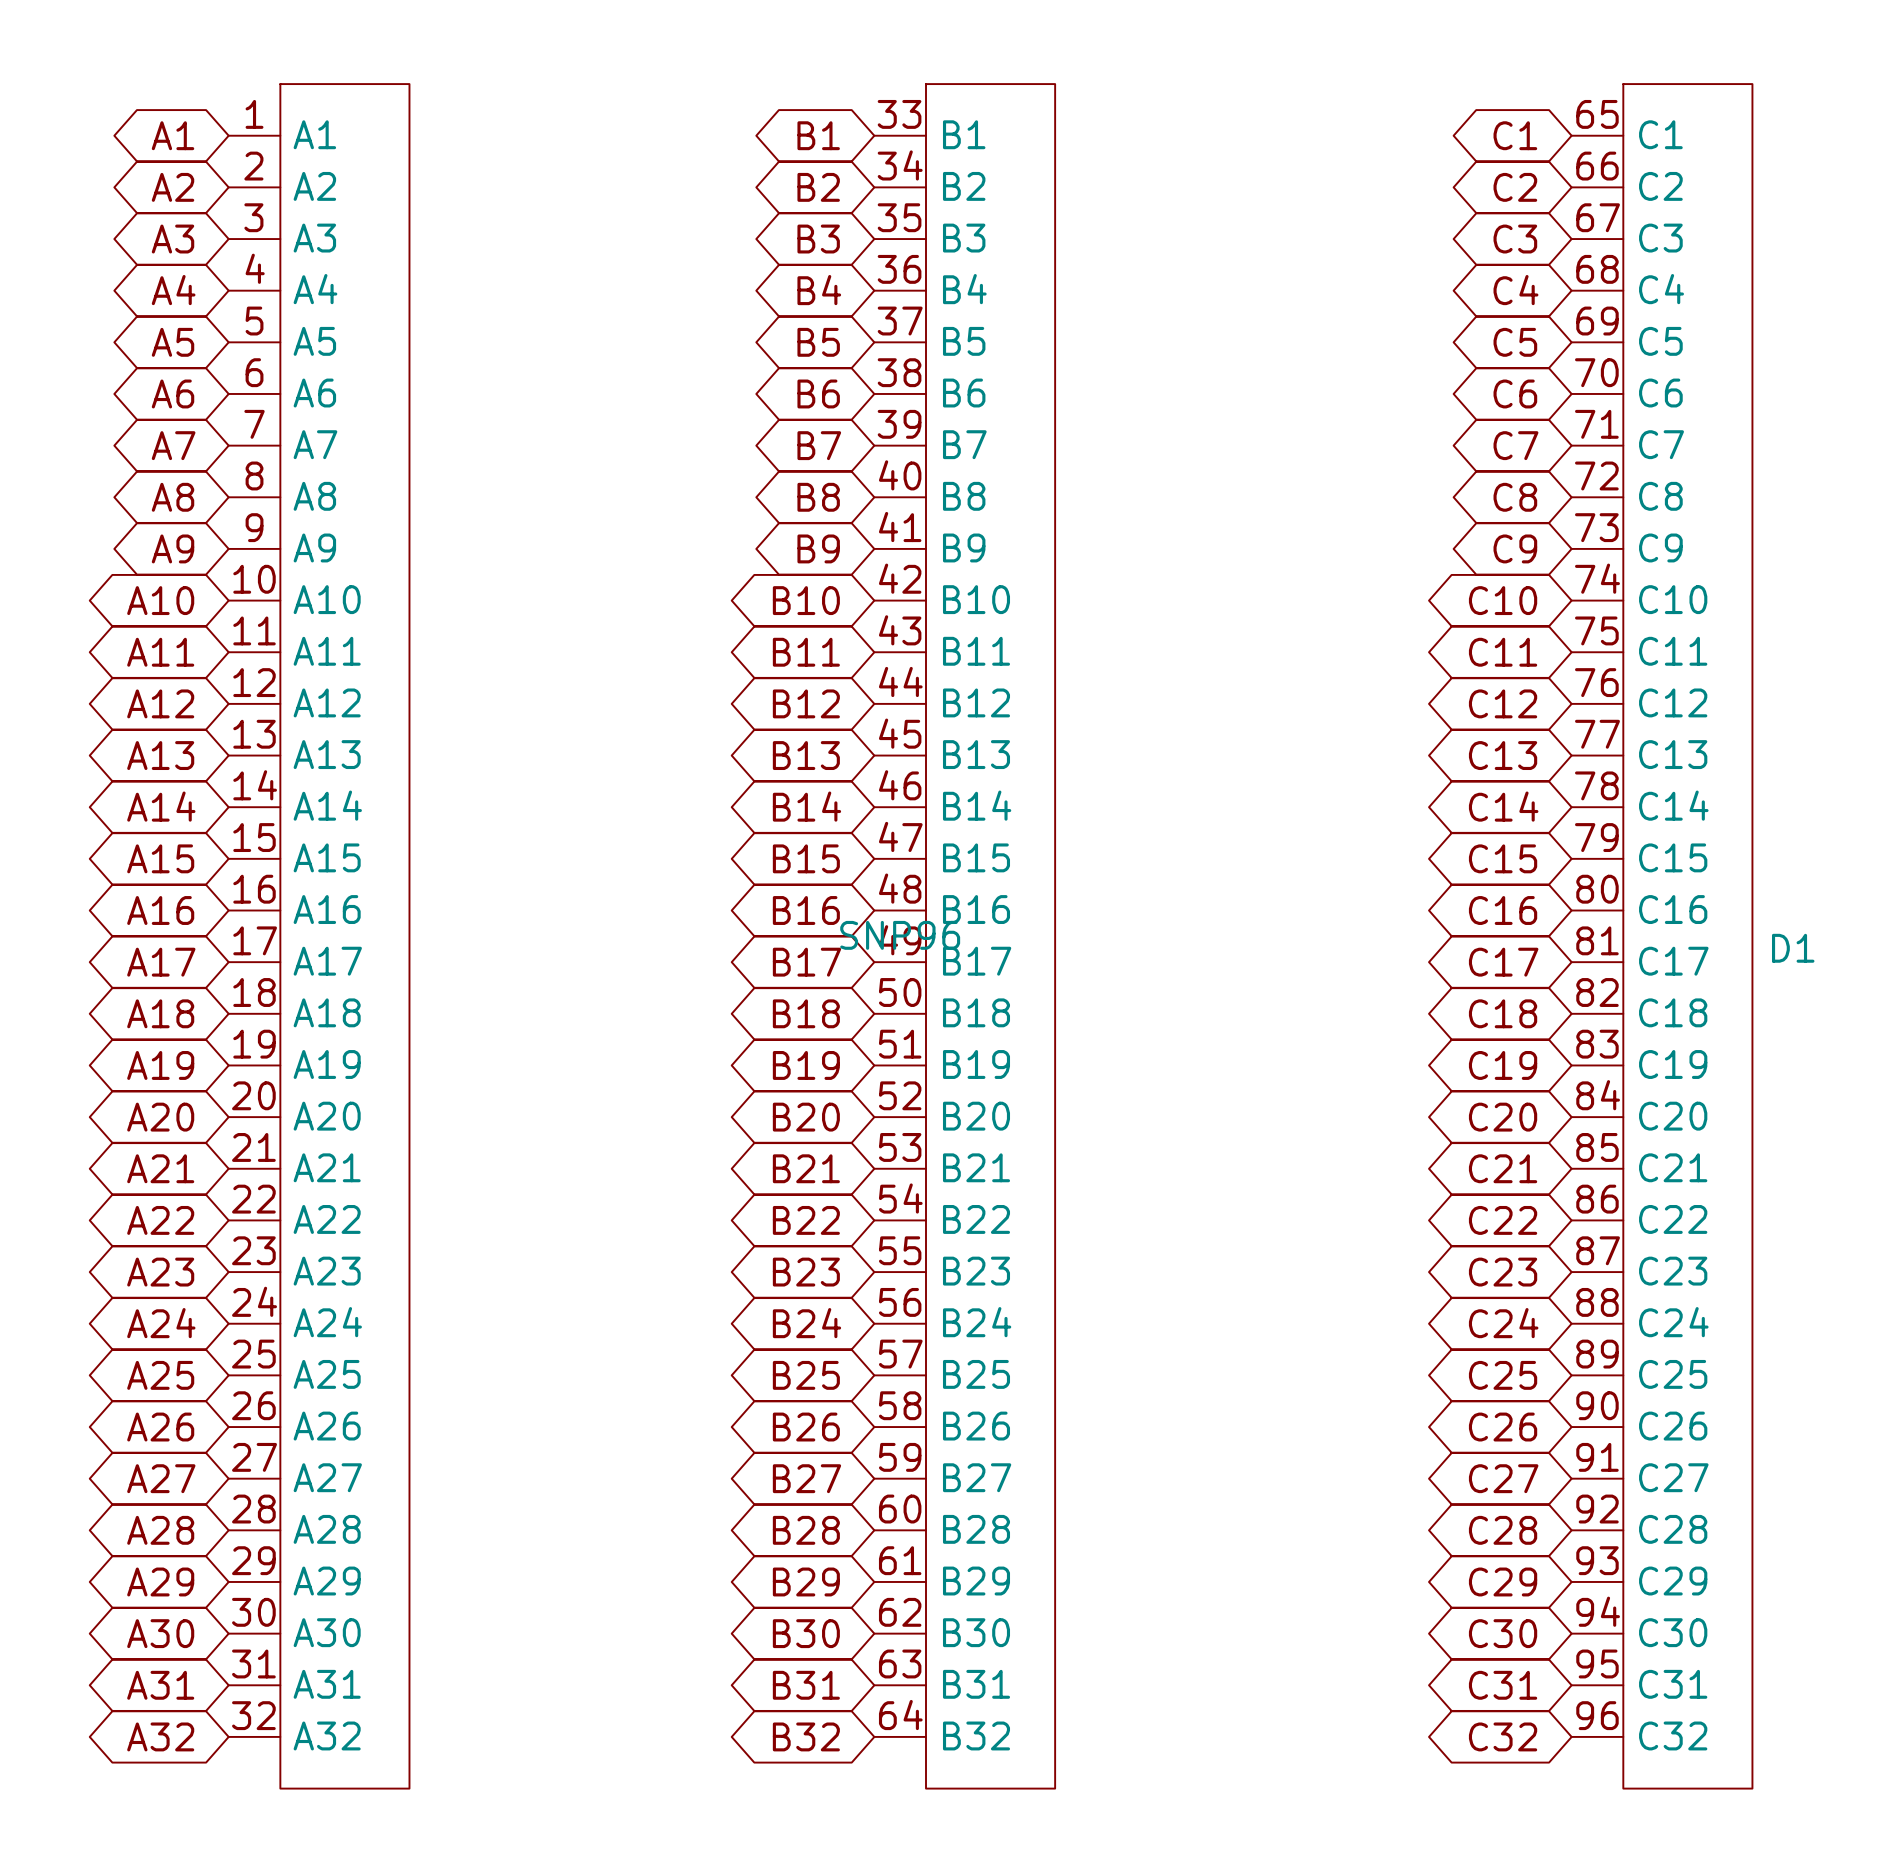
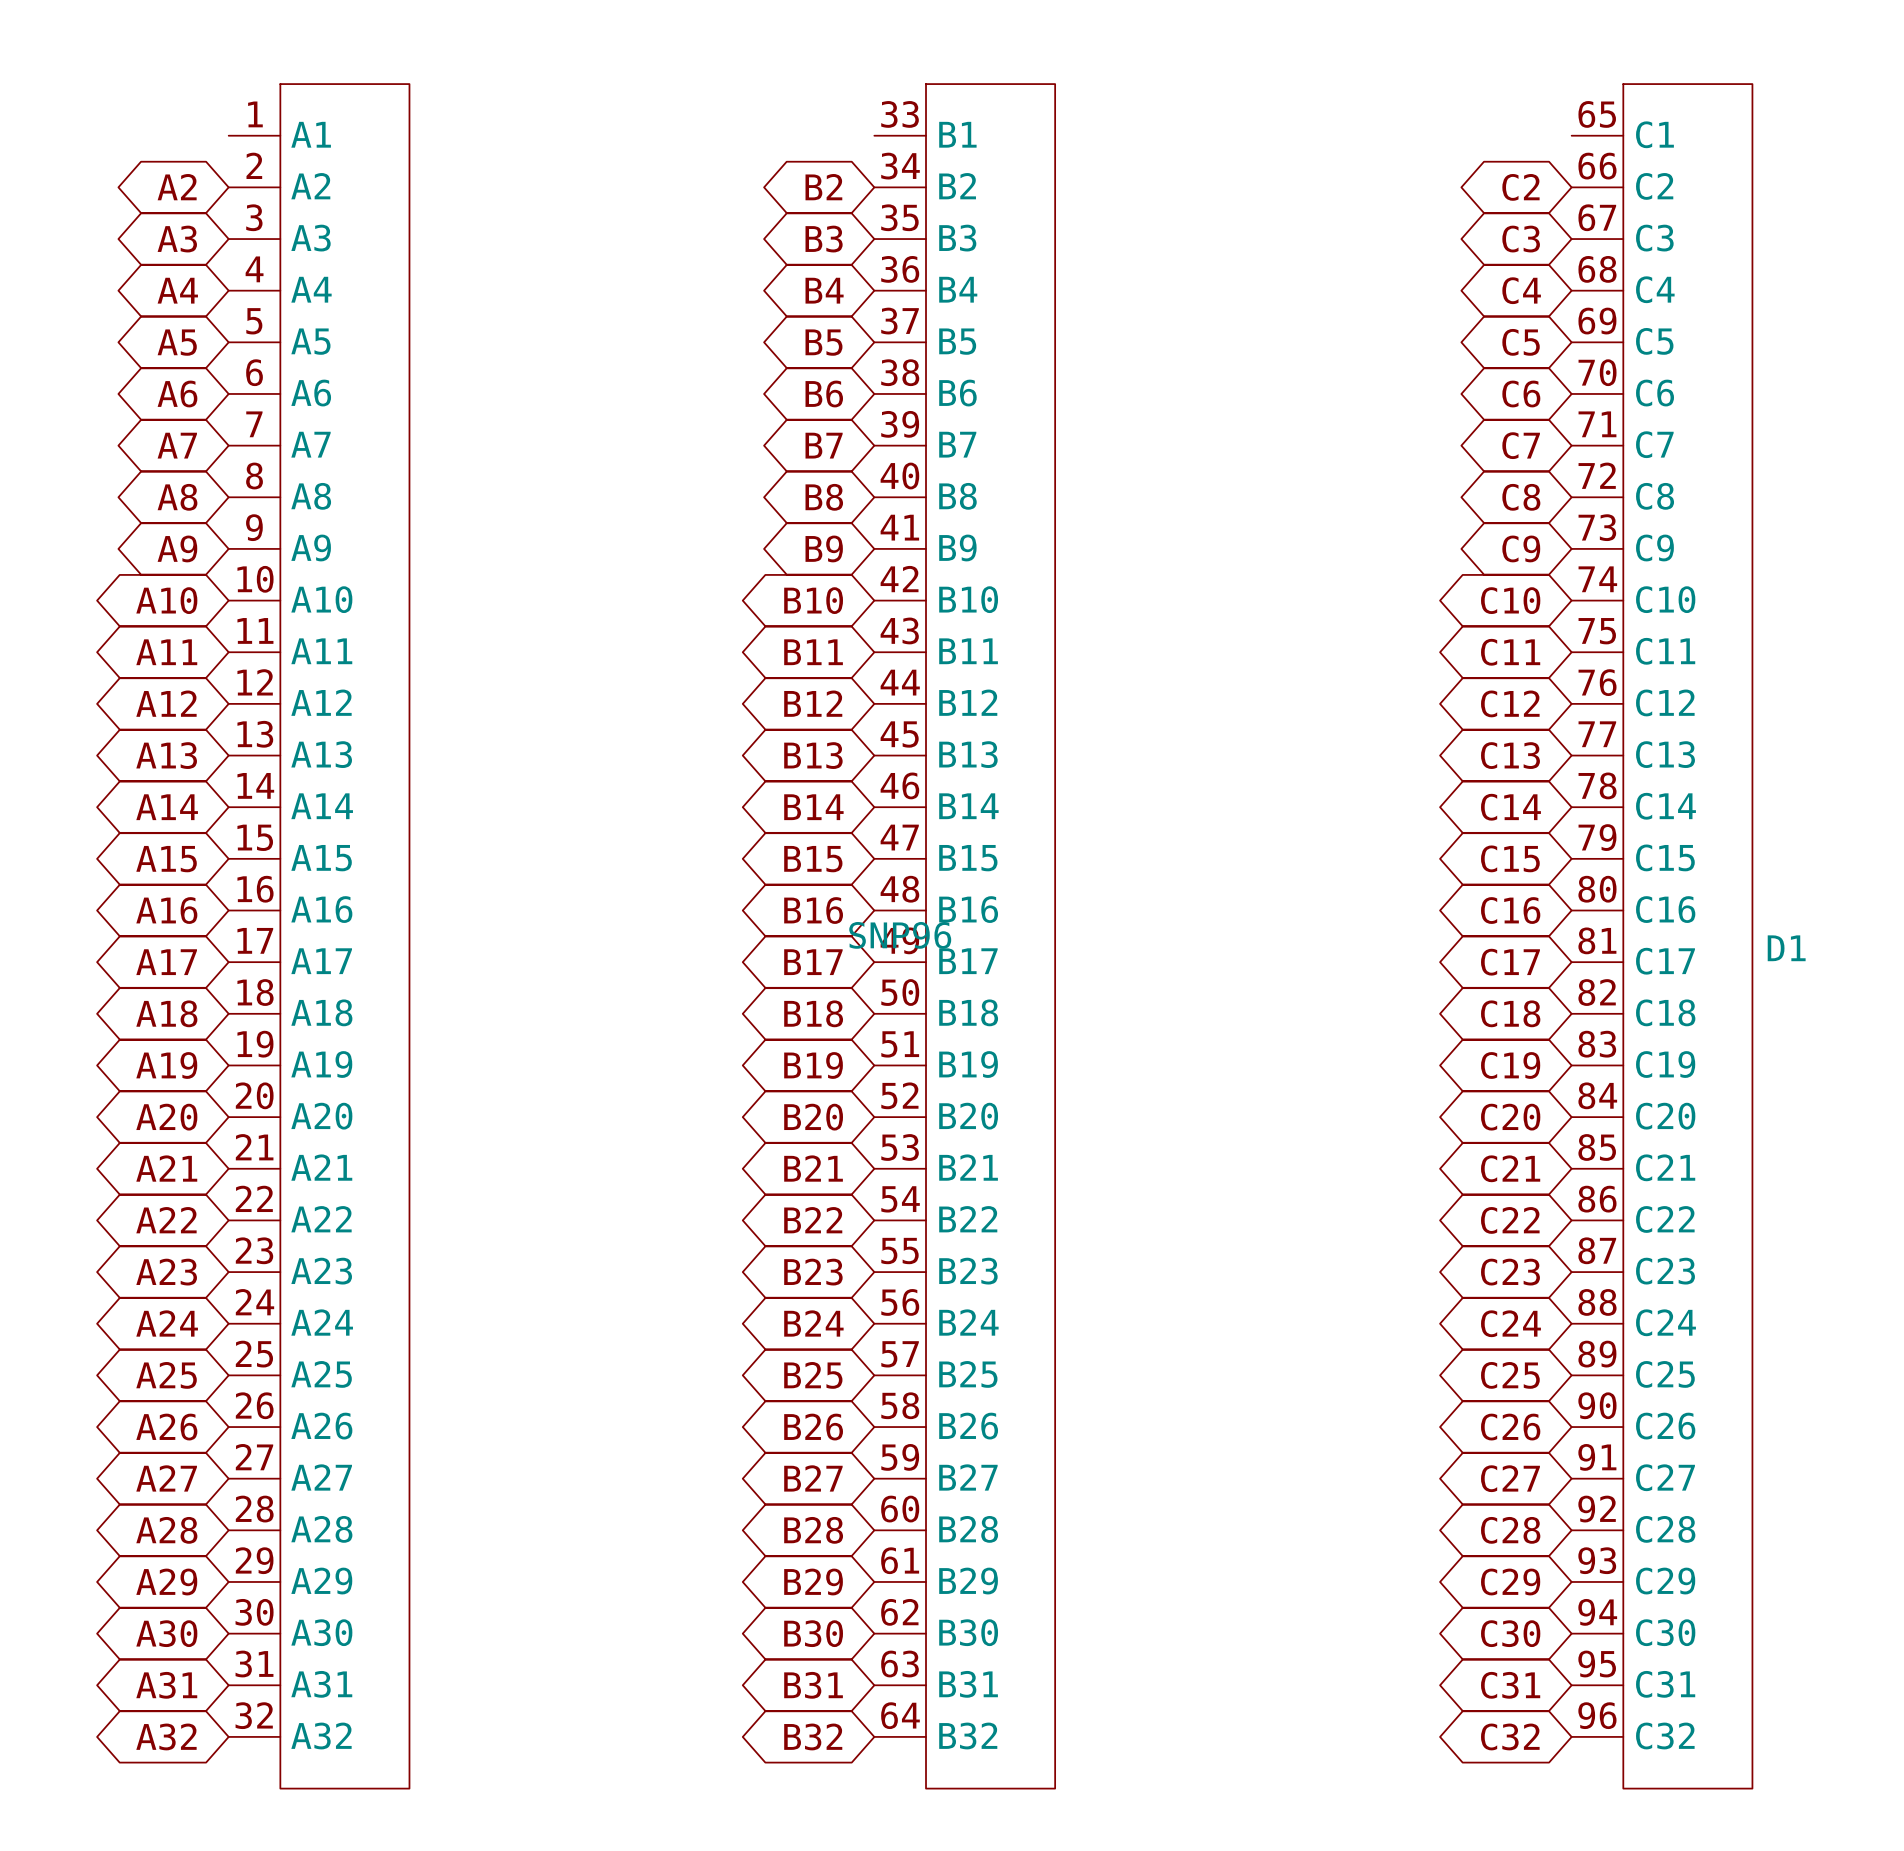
global label: A1 (173, 135) -> none
global label: B1 (818, 135) -> none
global label: C1 (1515, 135) -> none

